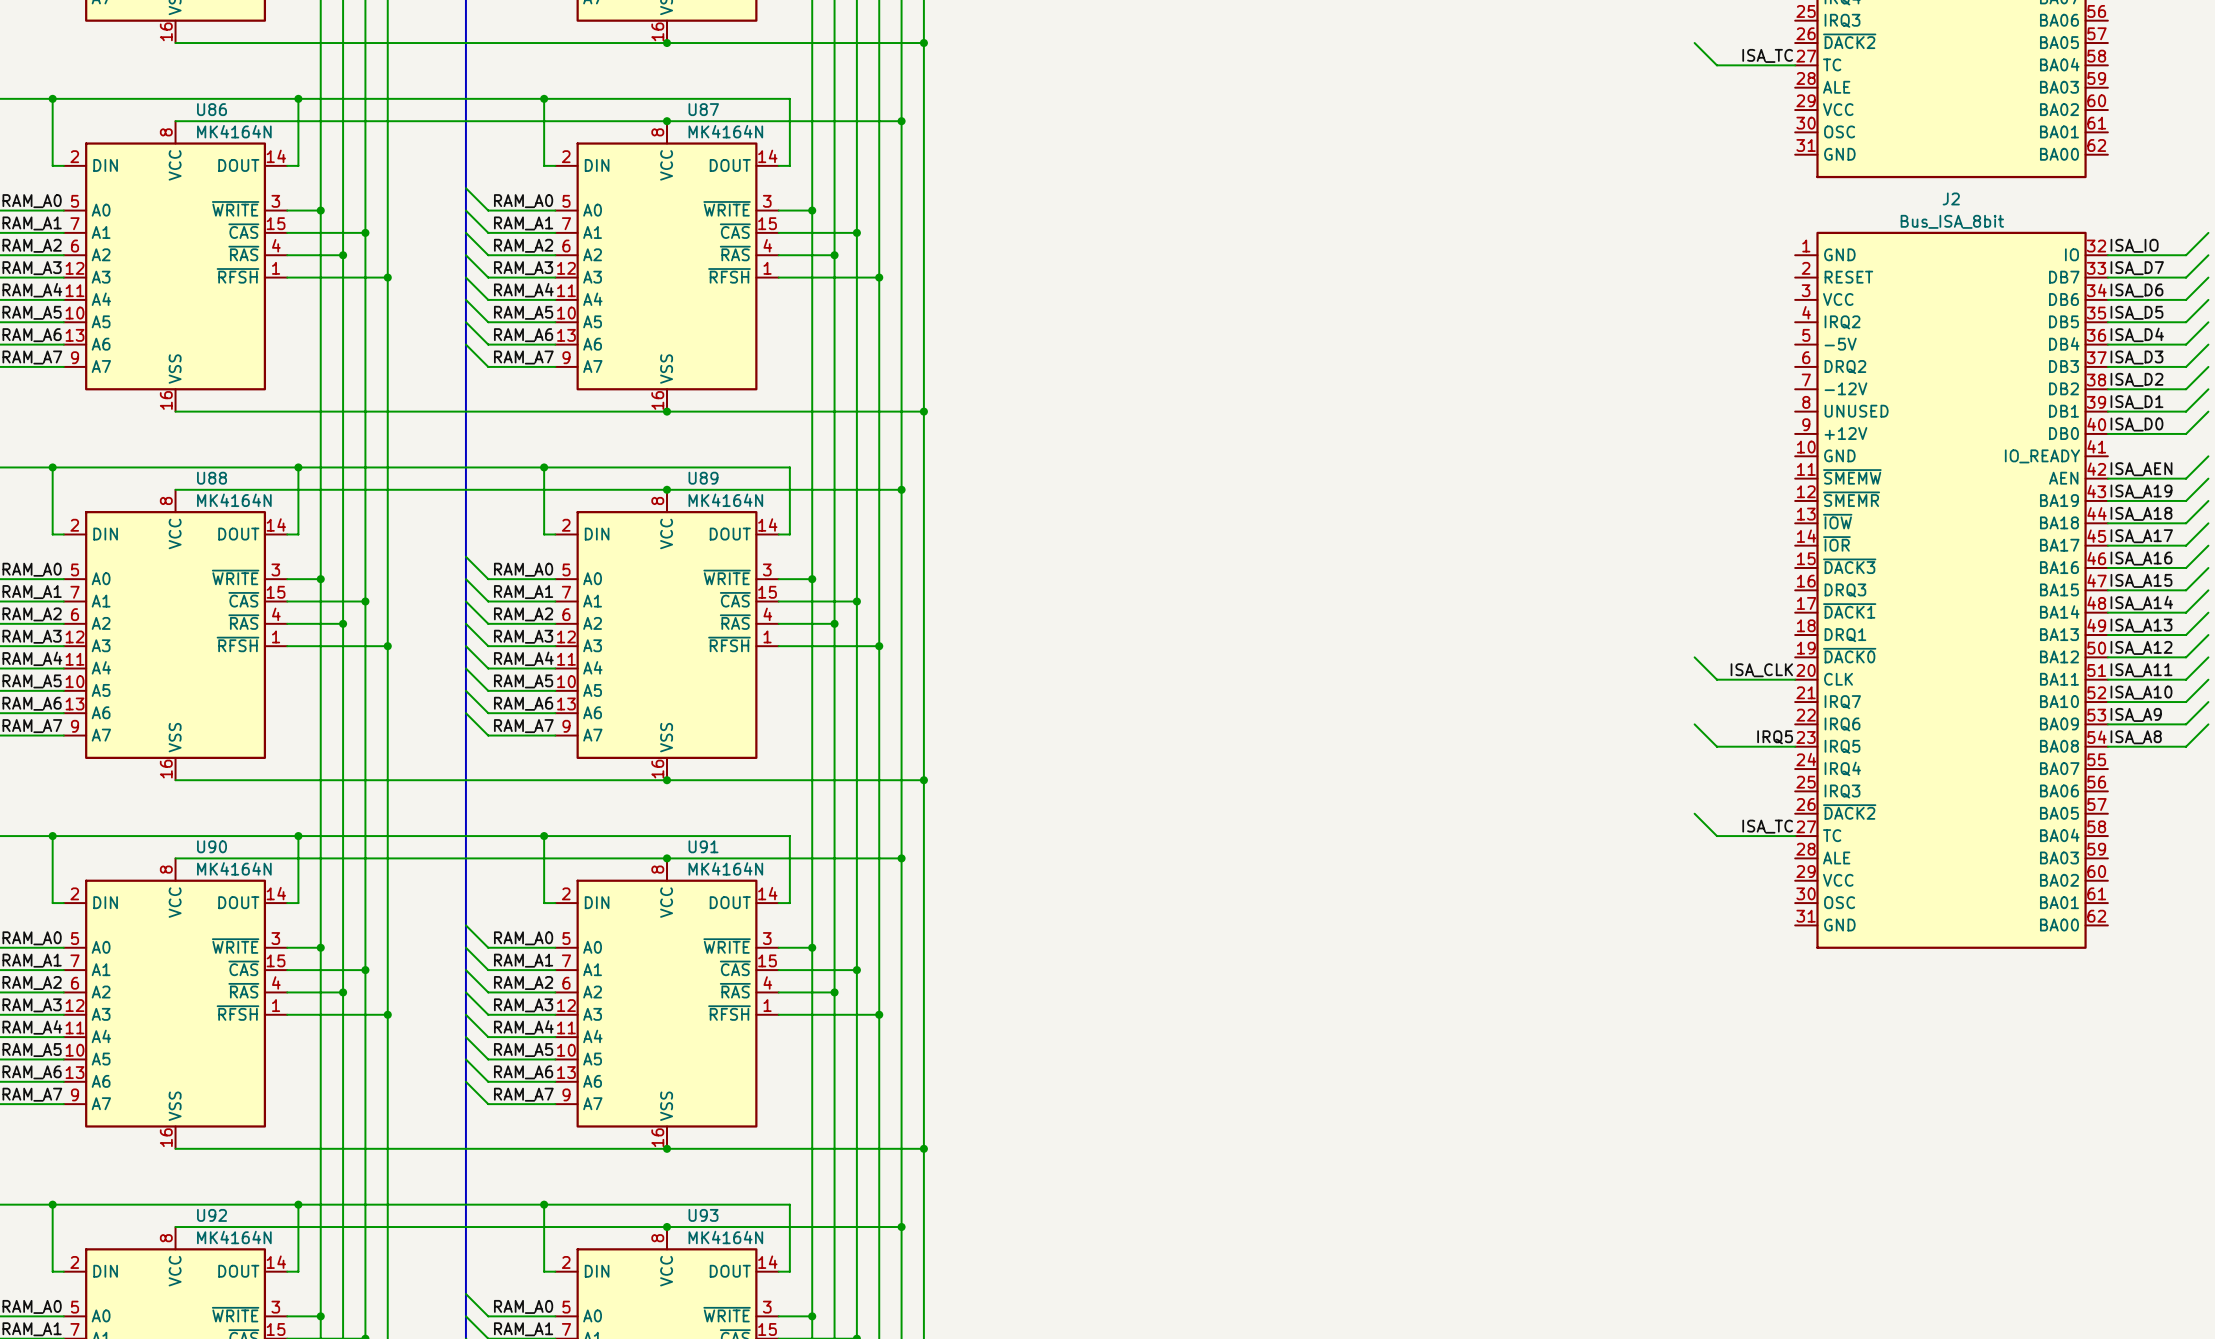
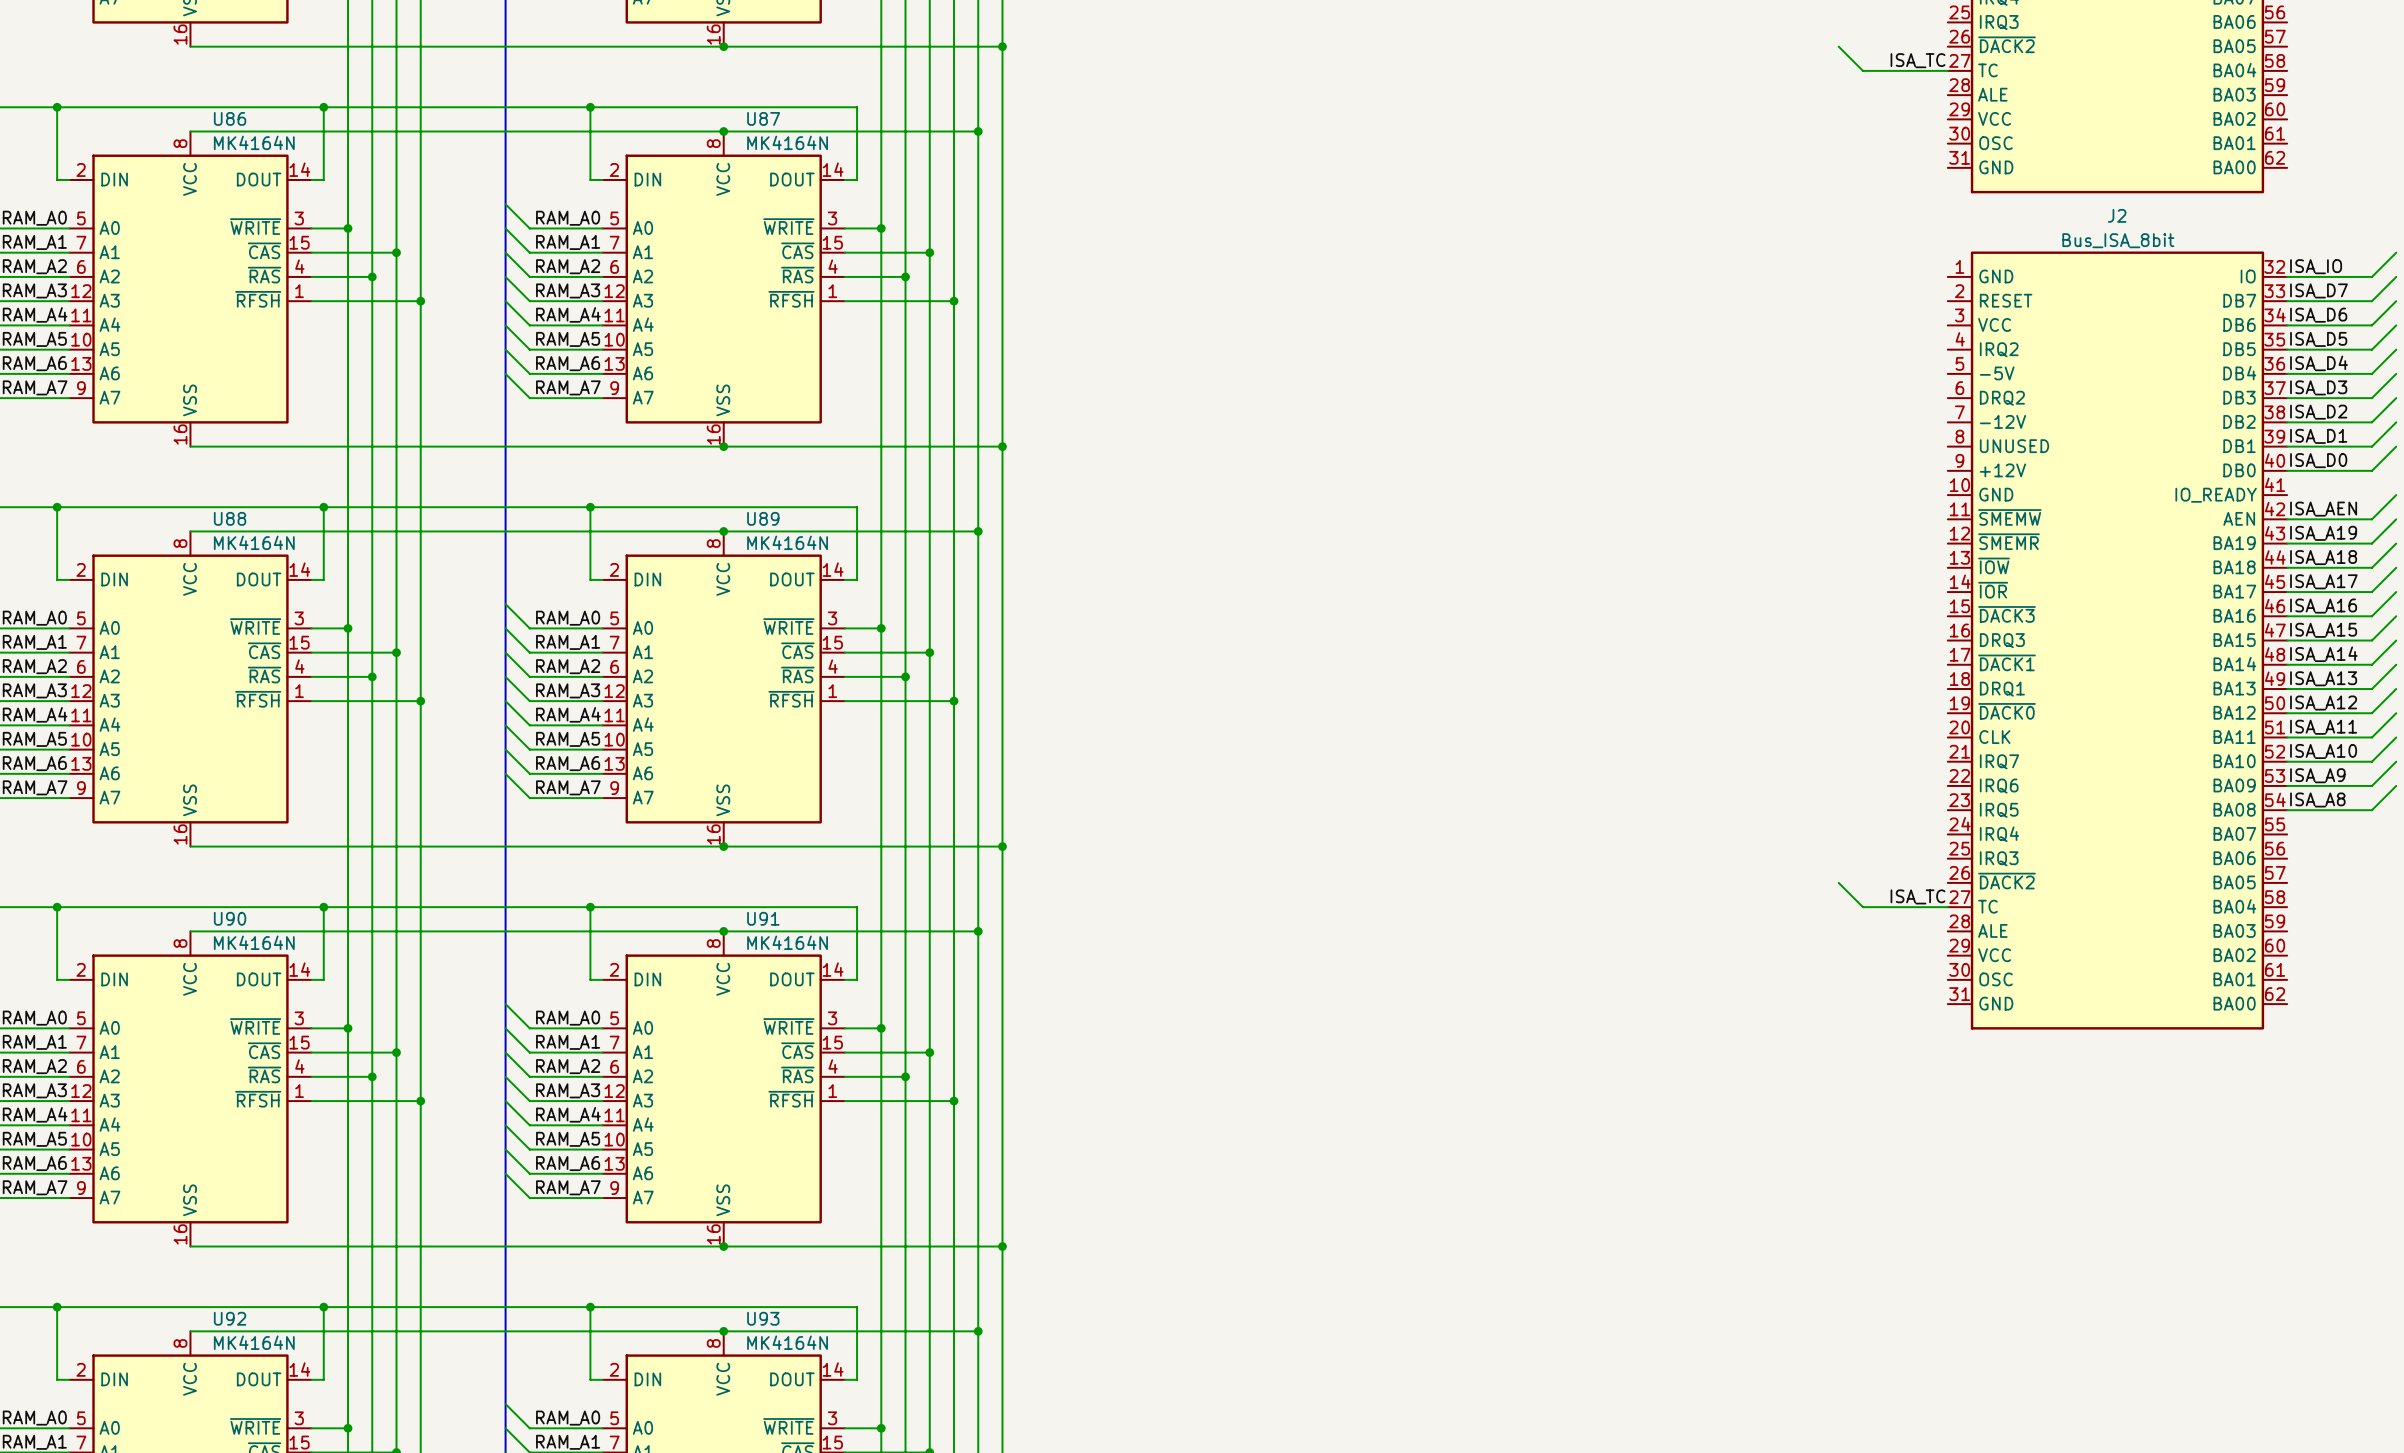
wire: (1694, 657) (1716, 679) (1795, 679) -> none
label: ISA_CLK (1761, 670) -> none
wire: (1694, 724) (1716, 746) (1795, 746) -> none
label: IRQ5 (1775, 737) -> none

